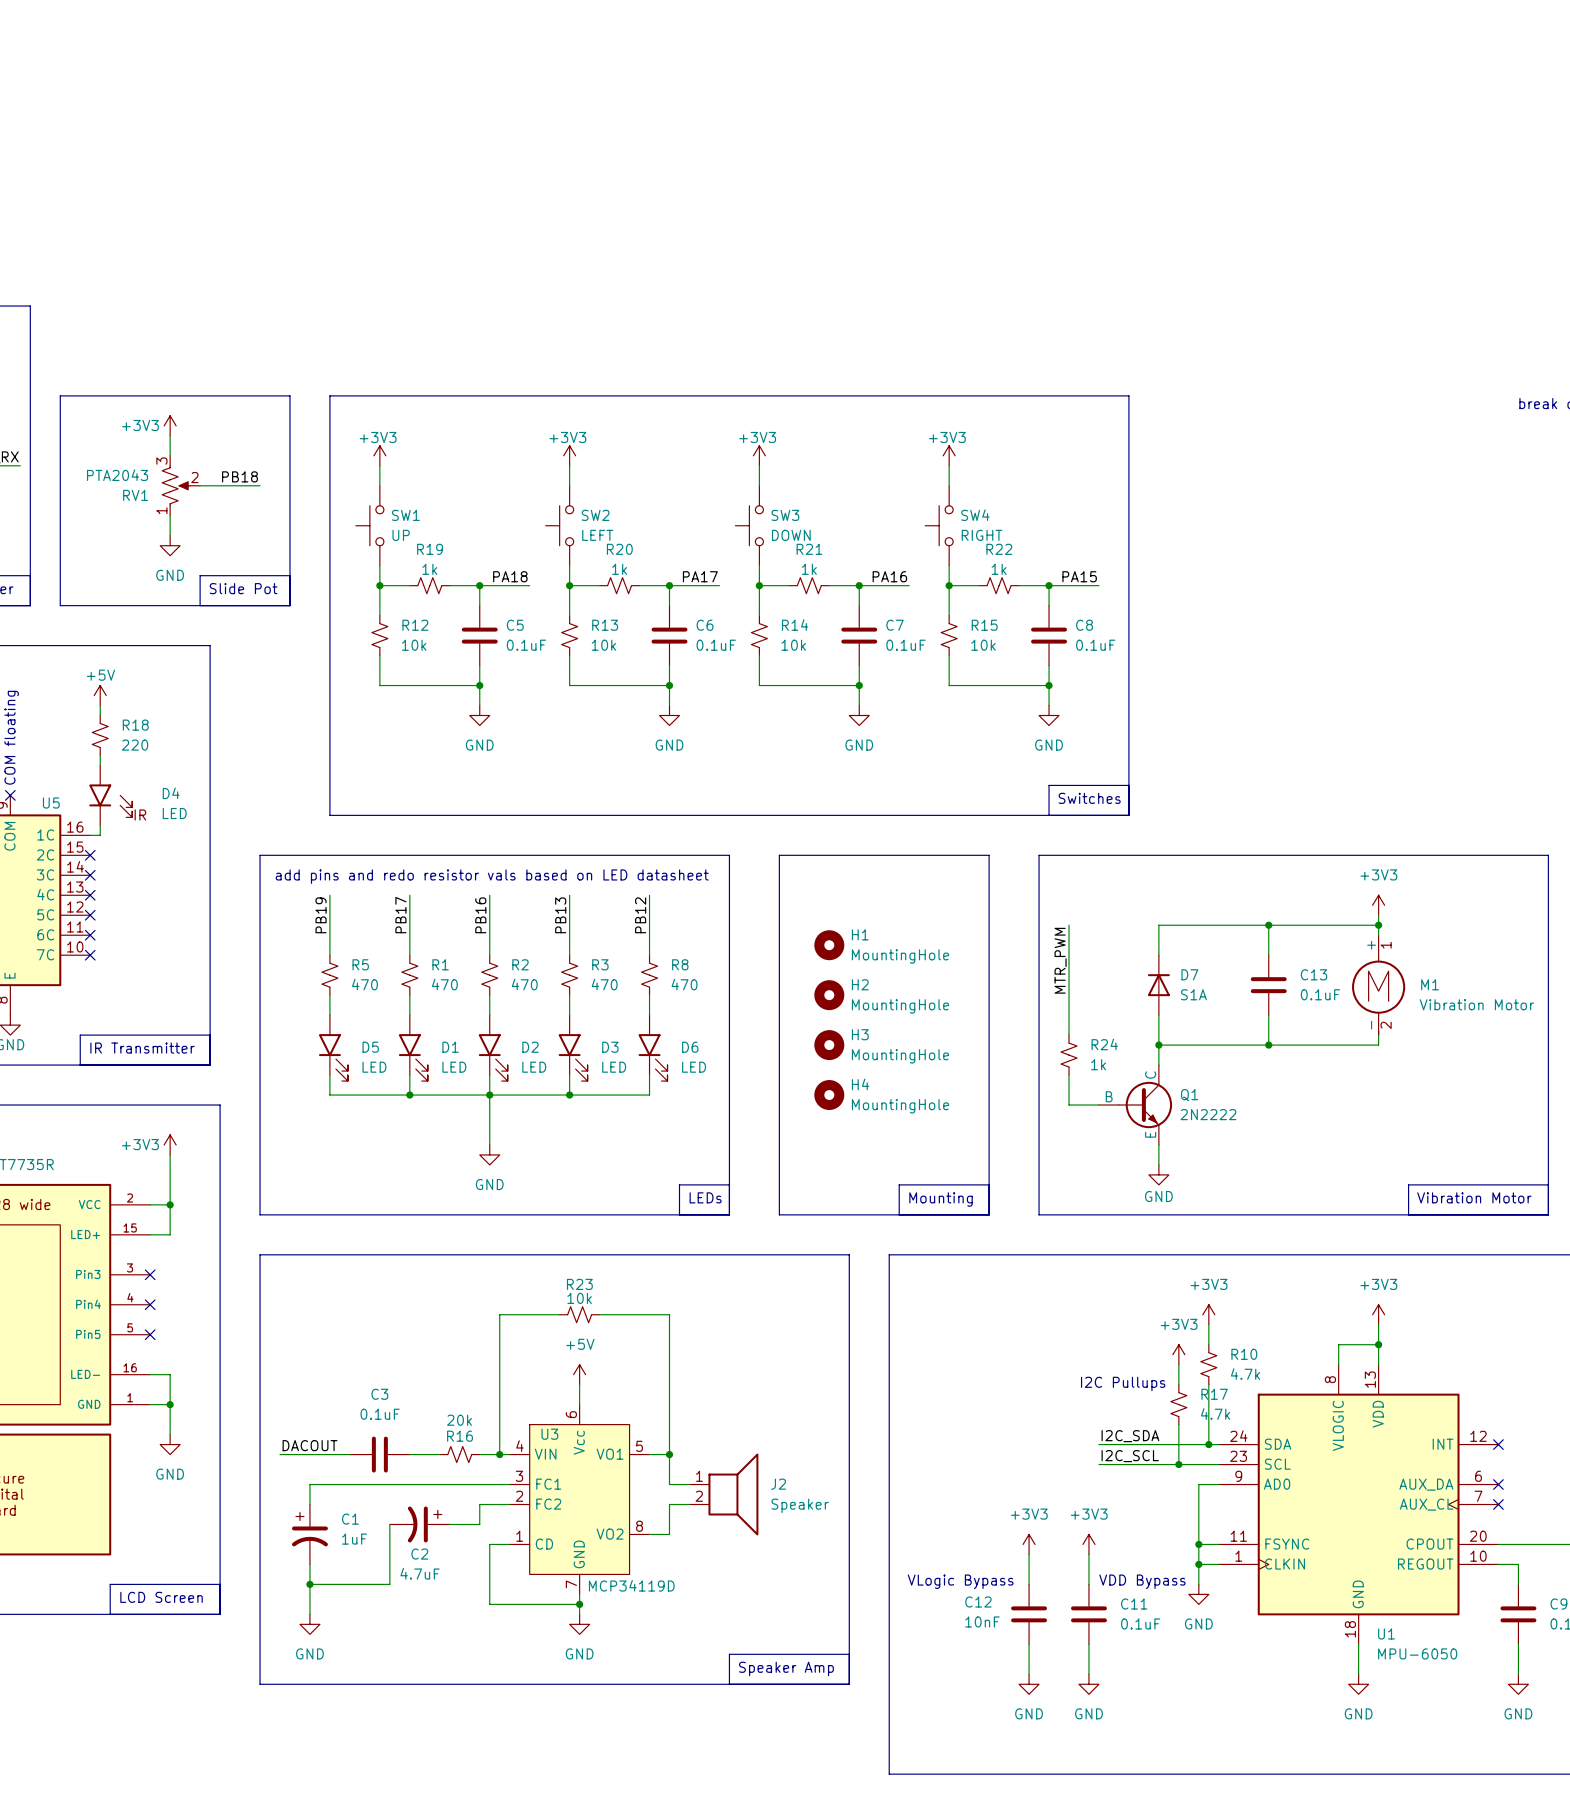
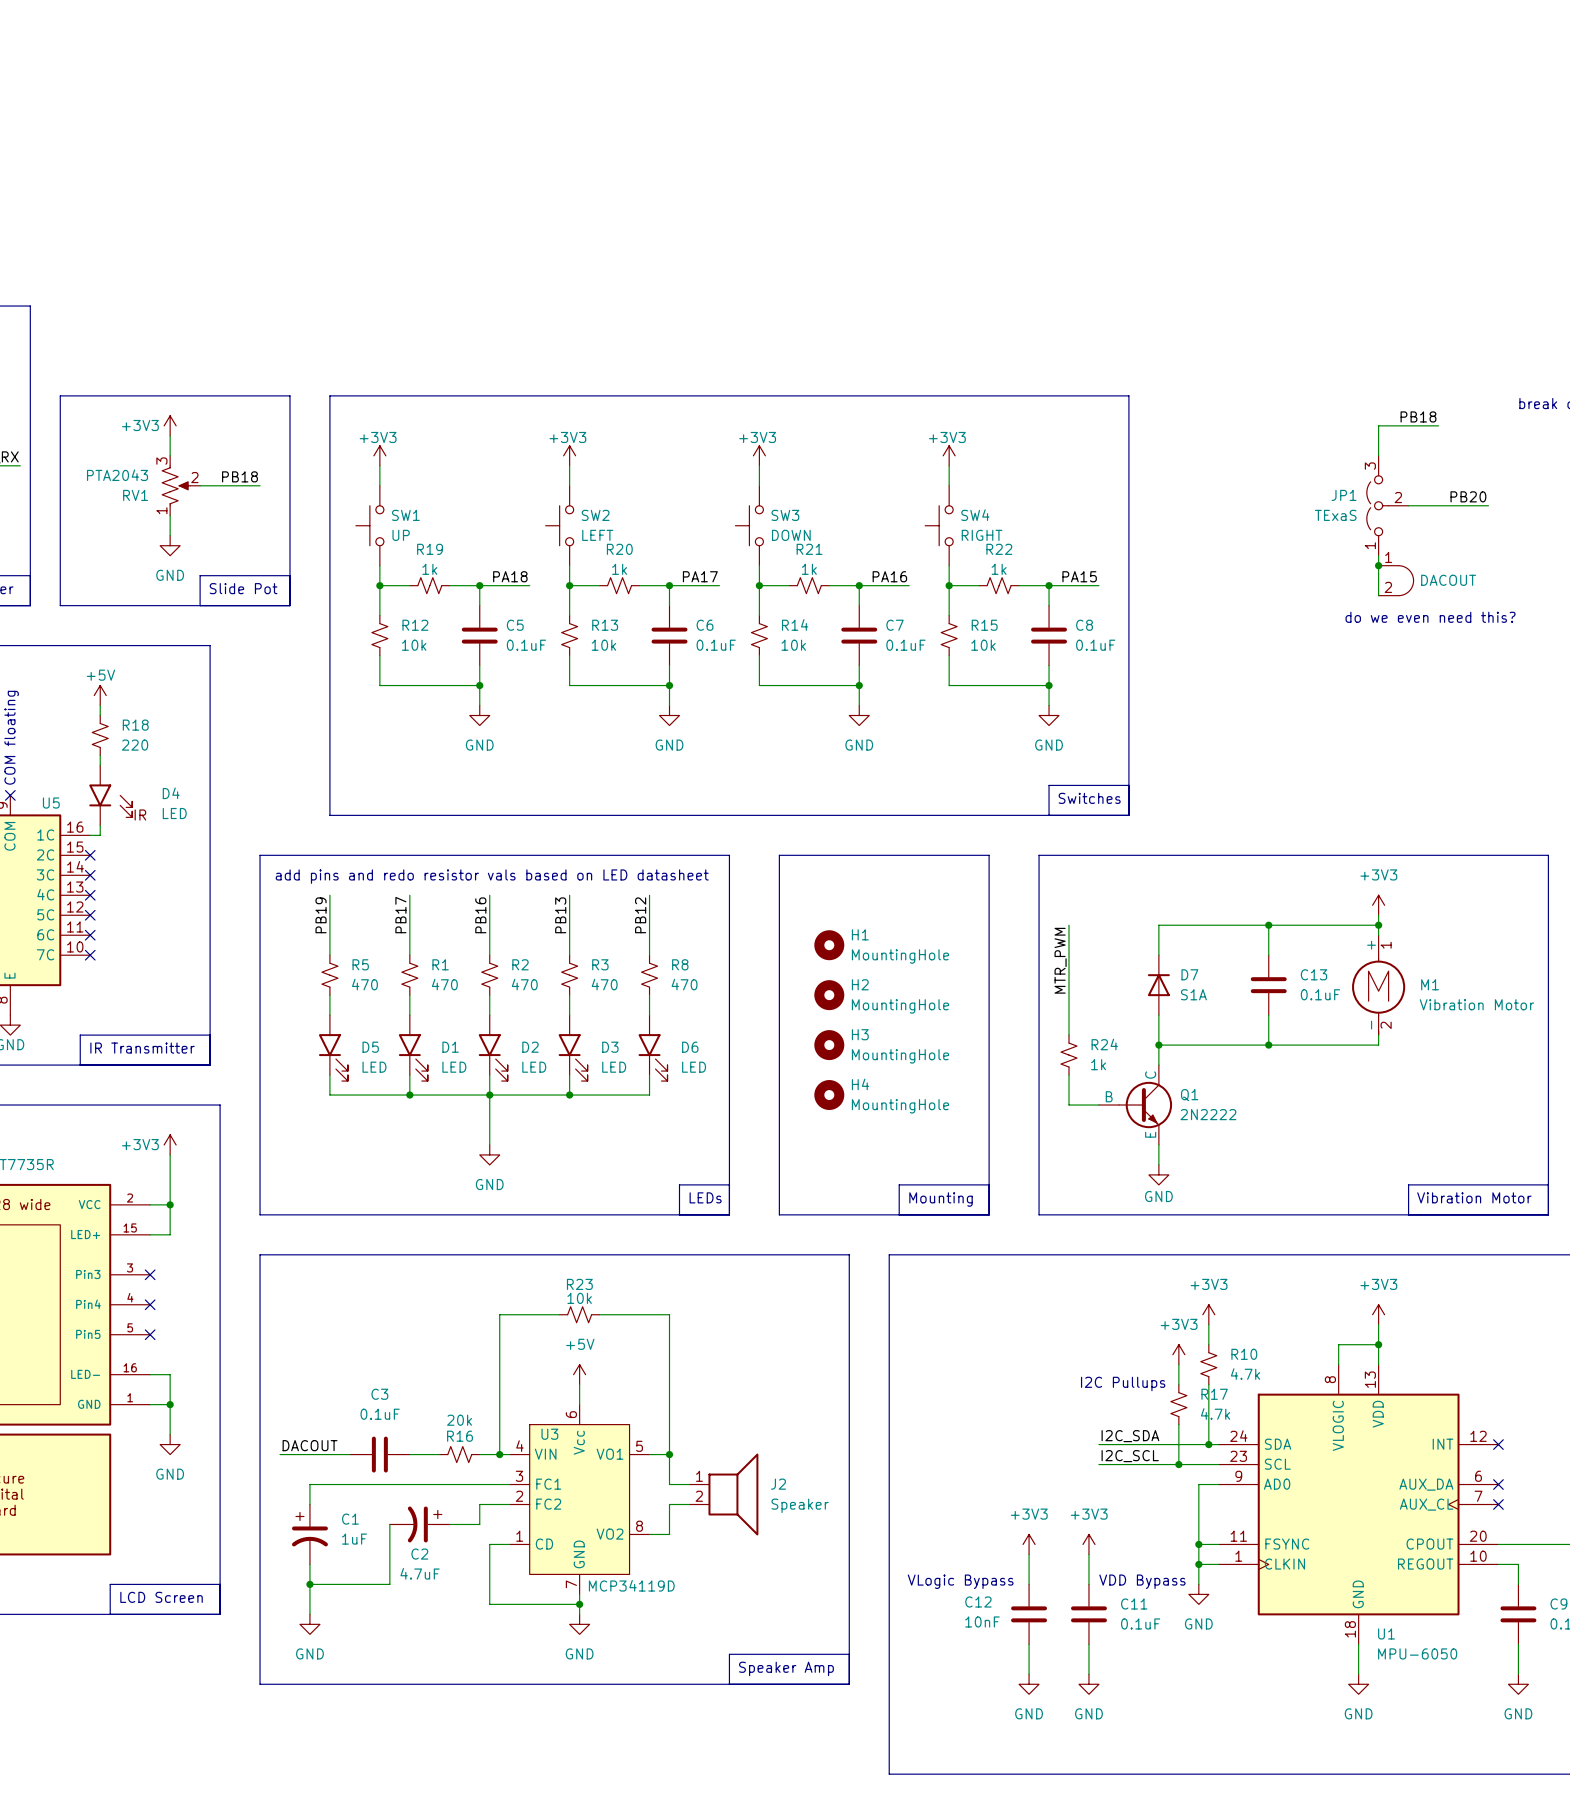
label: none -> PB18 (1418, 416)
wire: none -> (1438, 425) (1378, 425) (1378, 455)
label: none -> PB20 (1468, 496)
JP1: none -> TExaS (1387, 505)
wire: none -> (1408, 505) (1488, 505)
wire: none -> (1378, 555) (1378, 595)
junction: none -> (1378, 565)
part: none -> DACOUT (1396, 580)
text: none -> do we even need this? (1430, 617)

